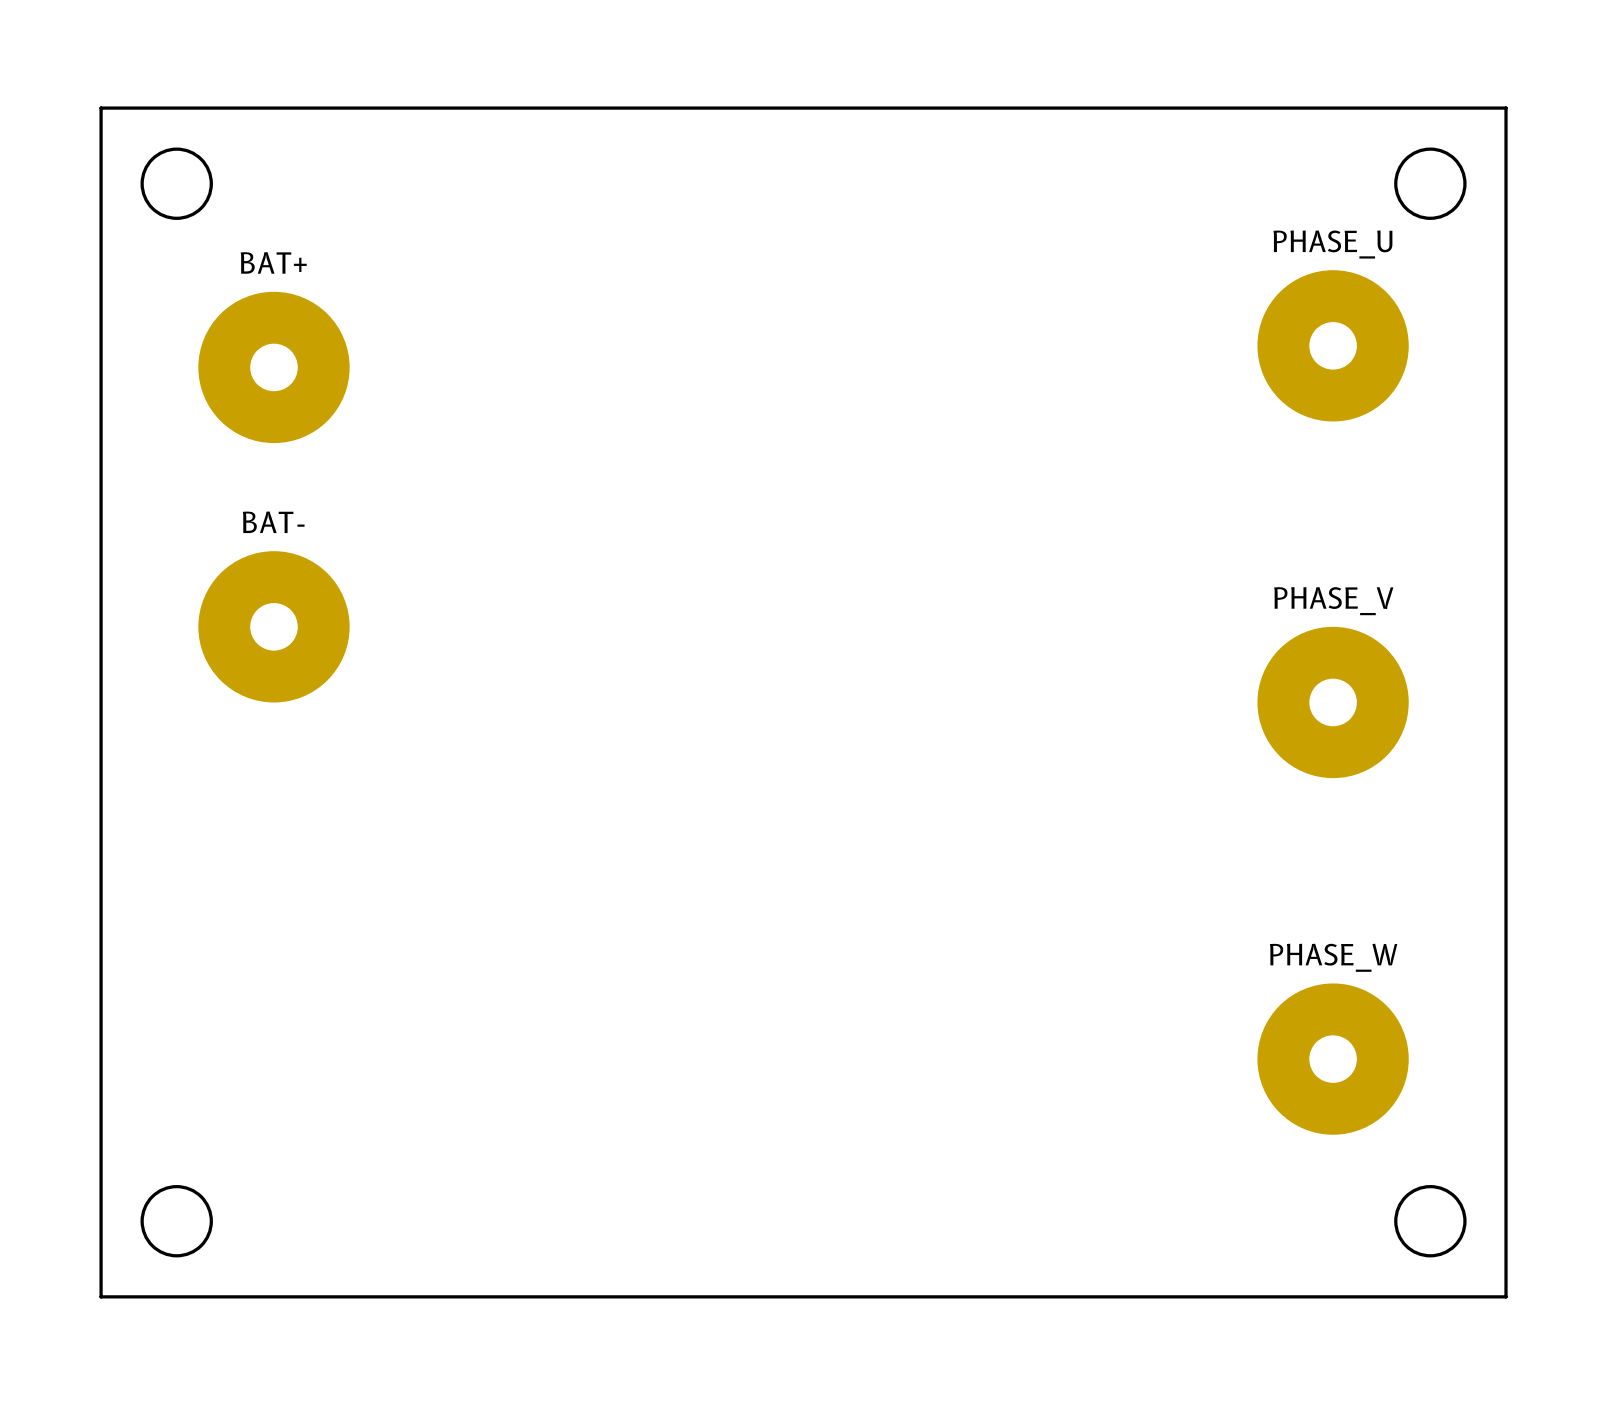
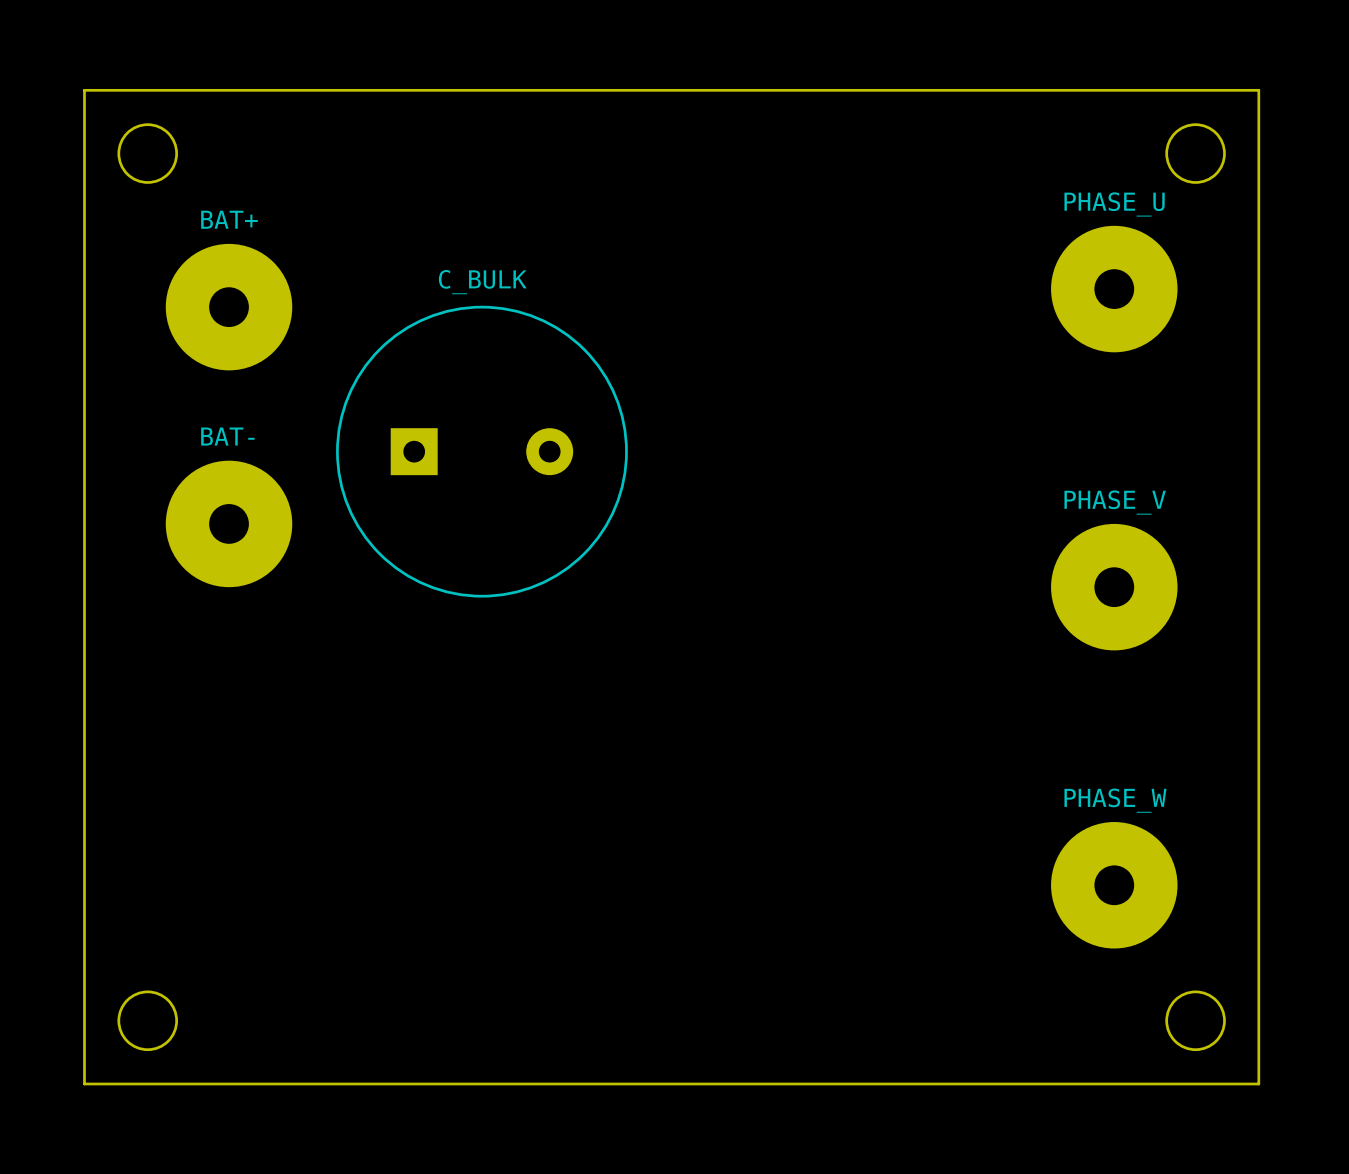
C_BULK: none -> (481, 451)

